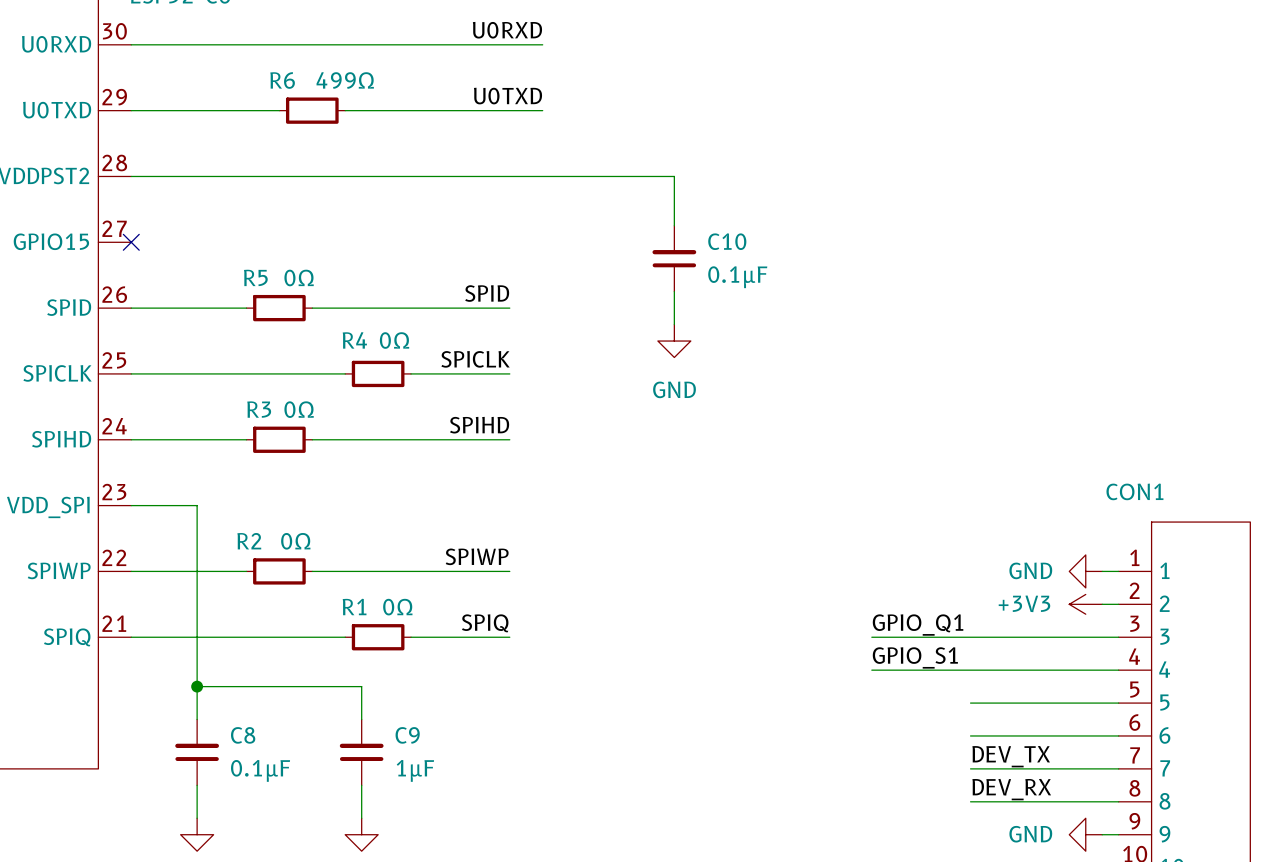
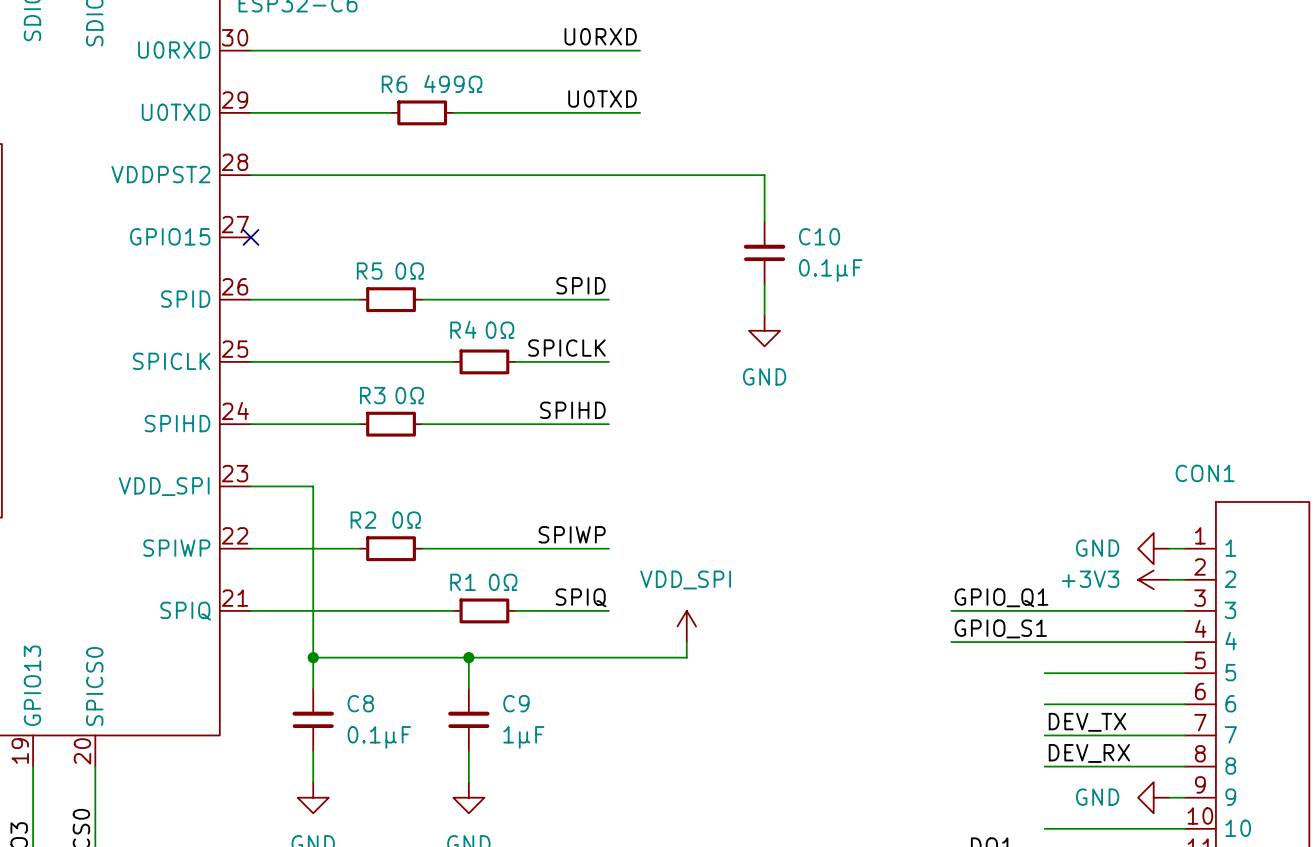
power symbol: none -> VDD_SPI (686, 626)
wire: none -> (686, 642) (686, 657) (468, 657)
junction: none -> (468, 657)

